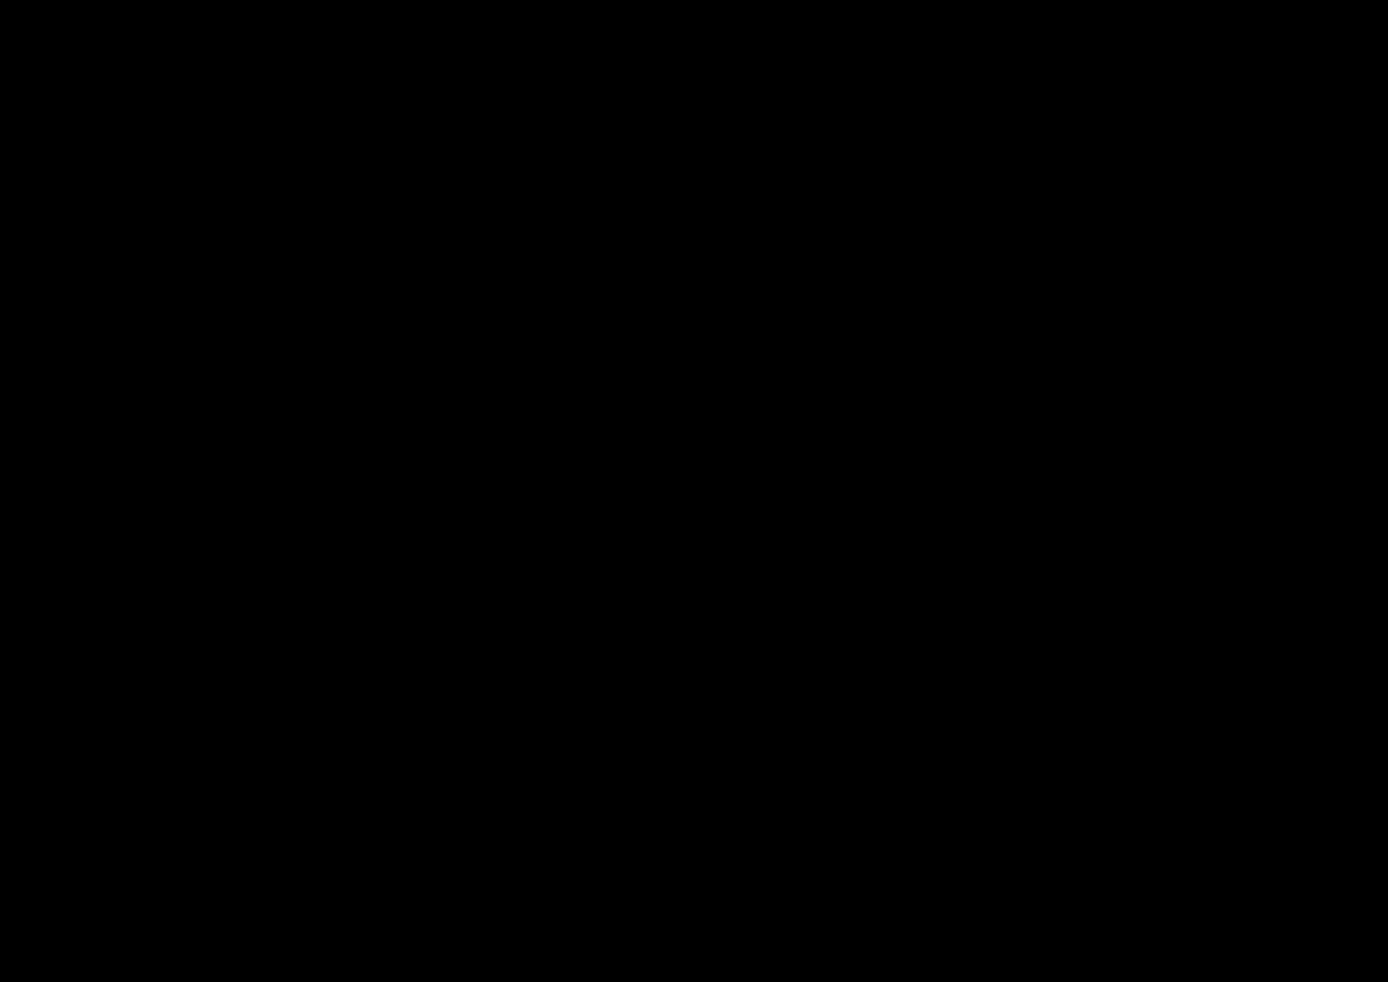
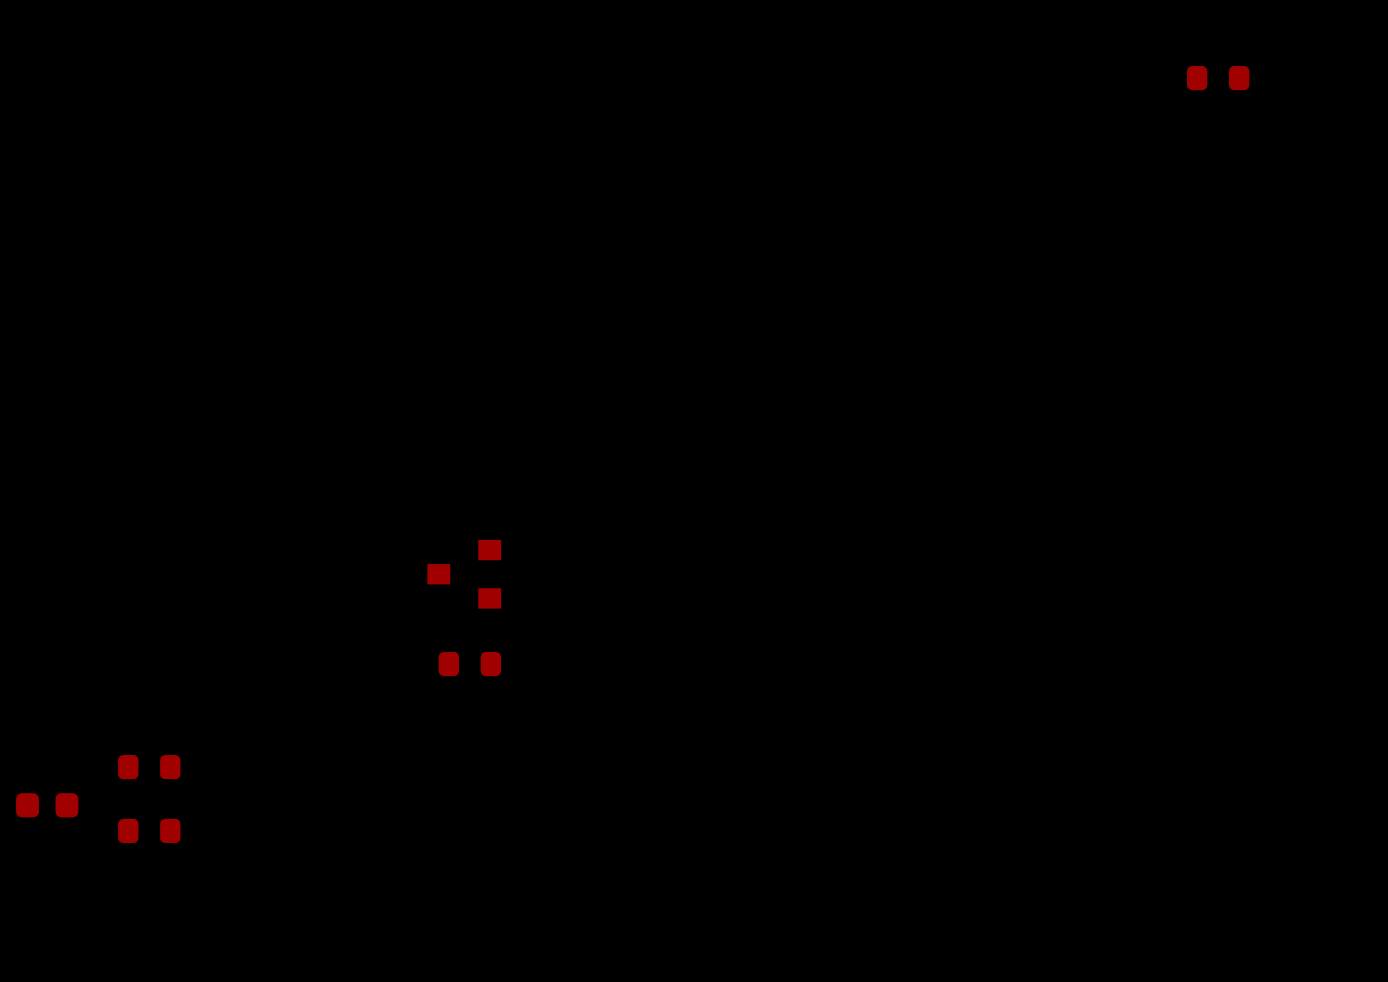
part: none -> (1218, 78)
part: none -> (464, 574)
part: none -> (469, 664)
part: none -> (149, 767)
part: none -> (47, 805)
part: none -> (149, 830)

